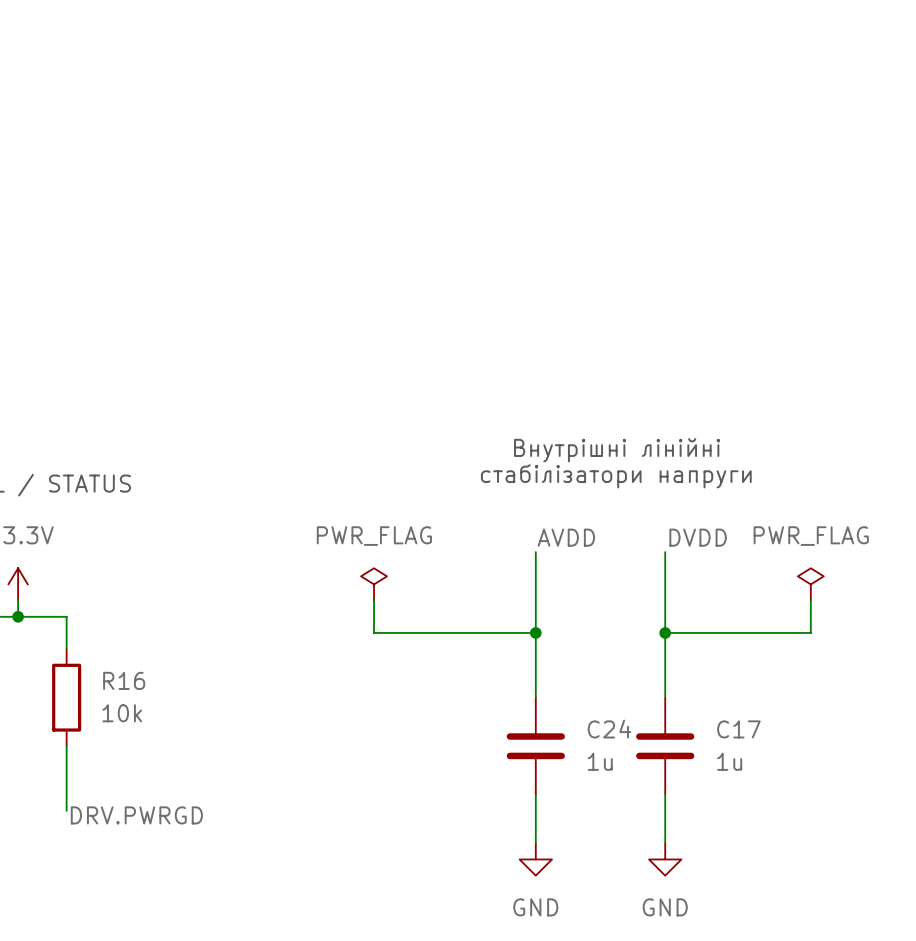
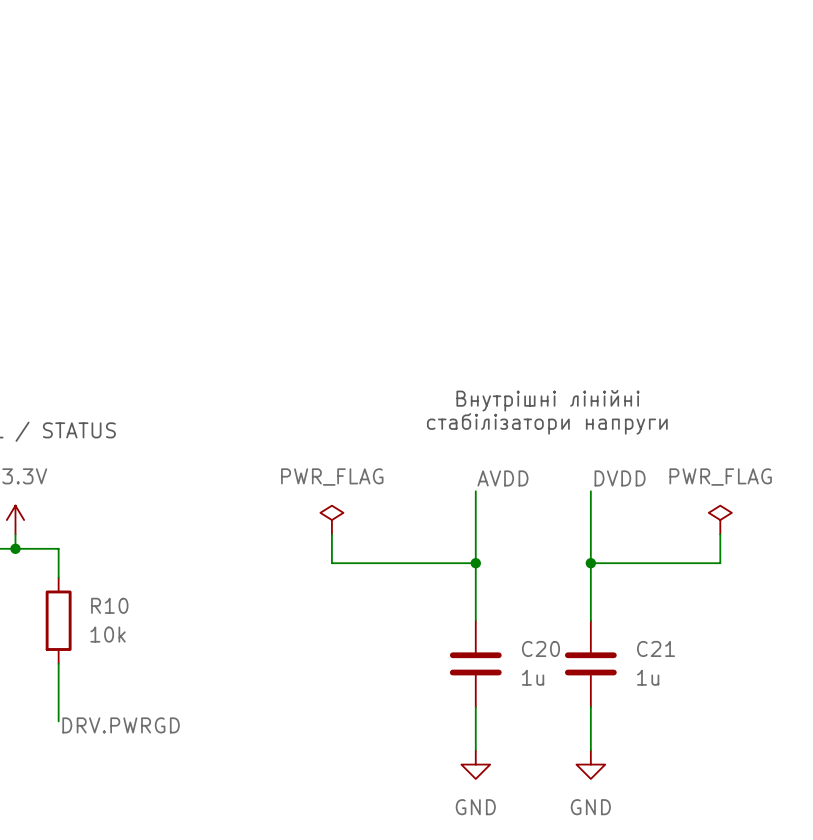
R16 name: R16 (124, 680) -> R10 (109, 605)
C24 name: C24 (609, 729) -> C20 (540, 648)
C17 name: C17 (738, 729) -> C21 (656, 648)

